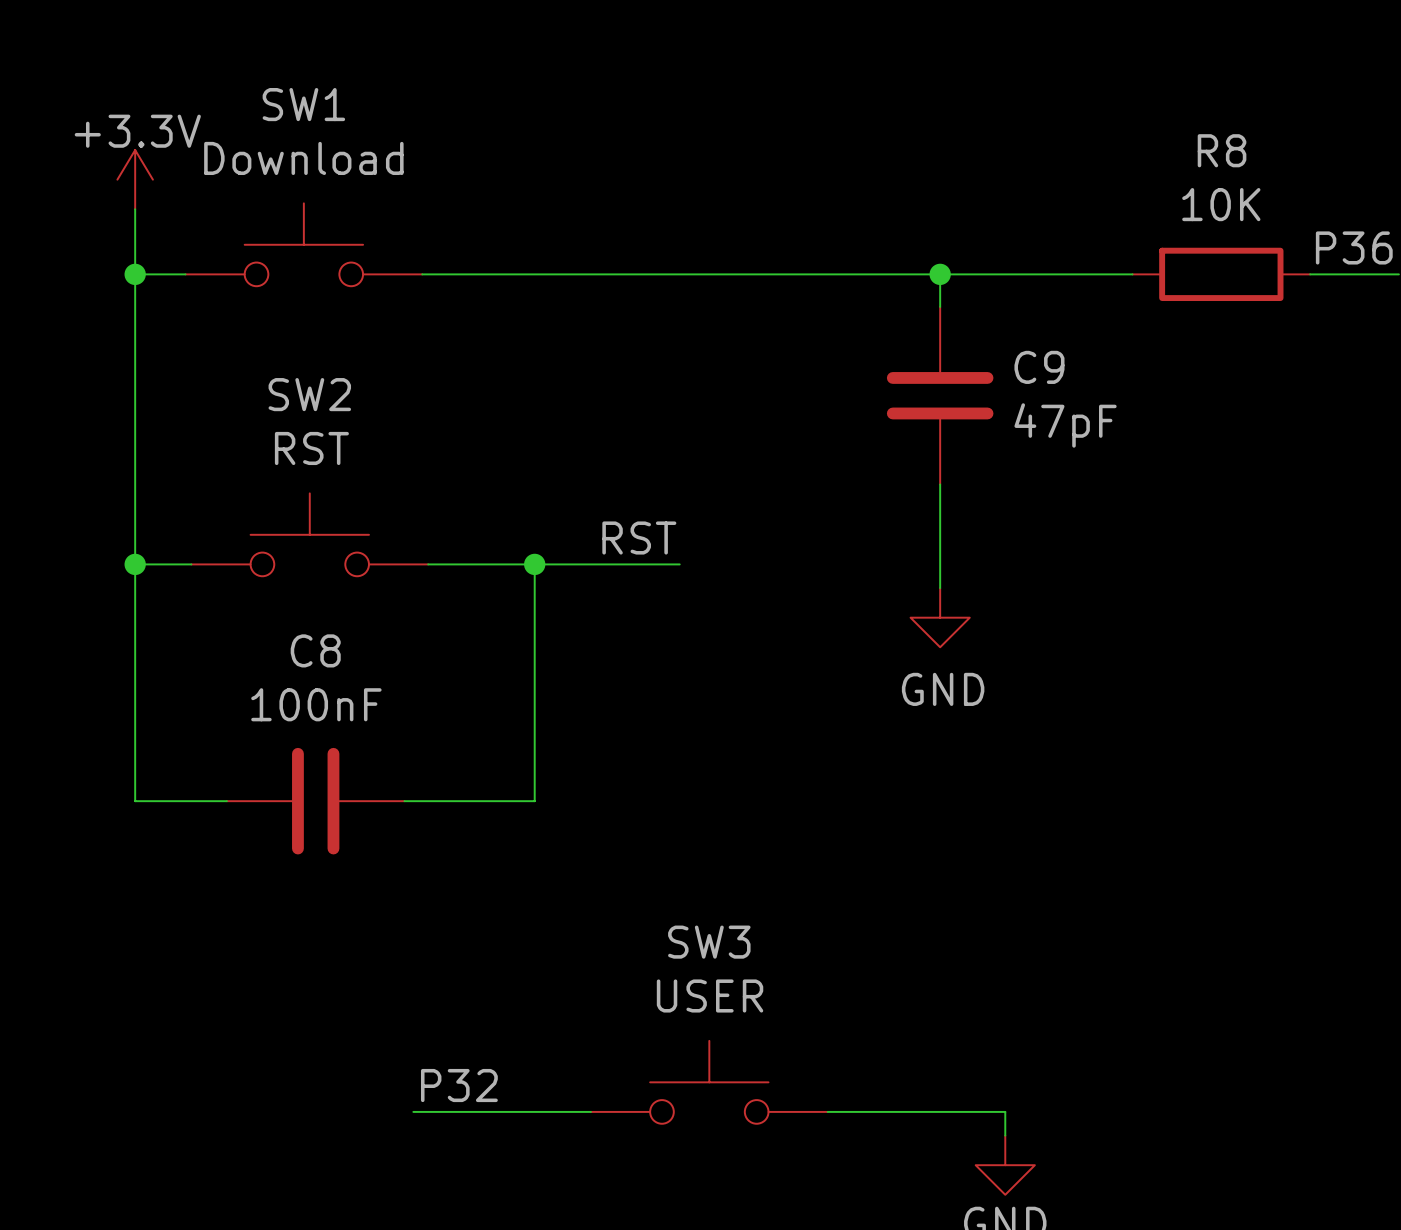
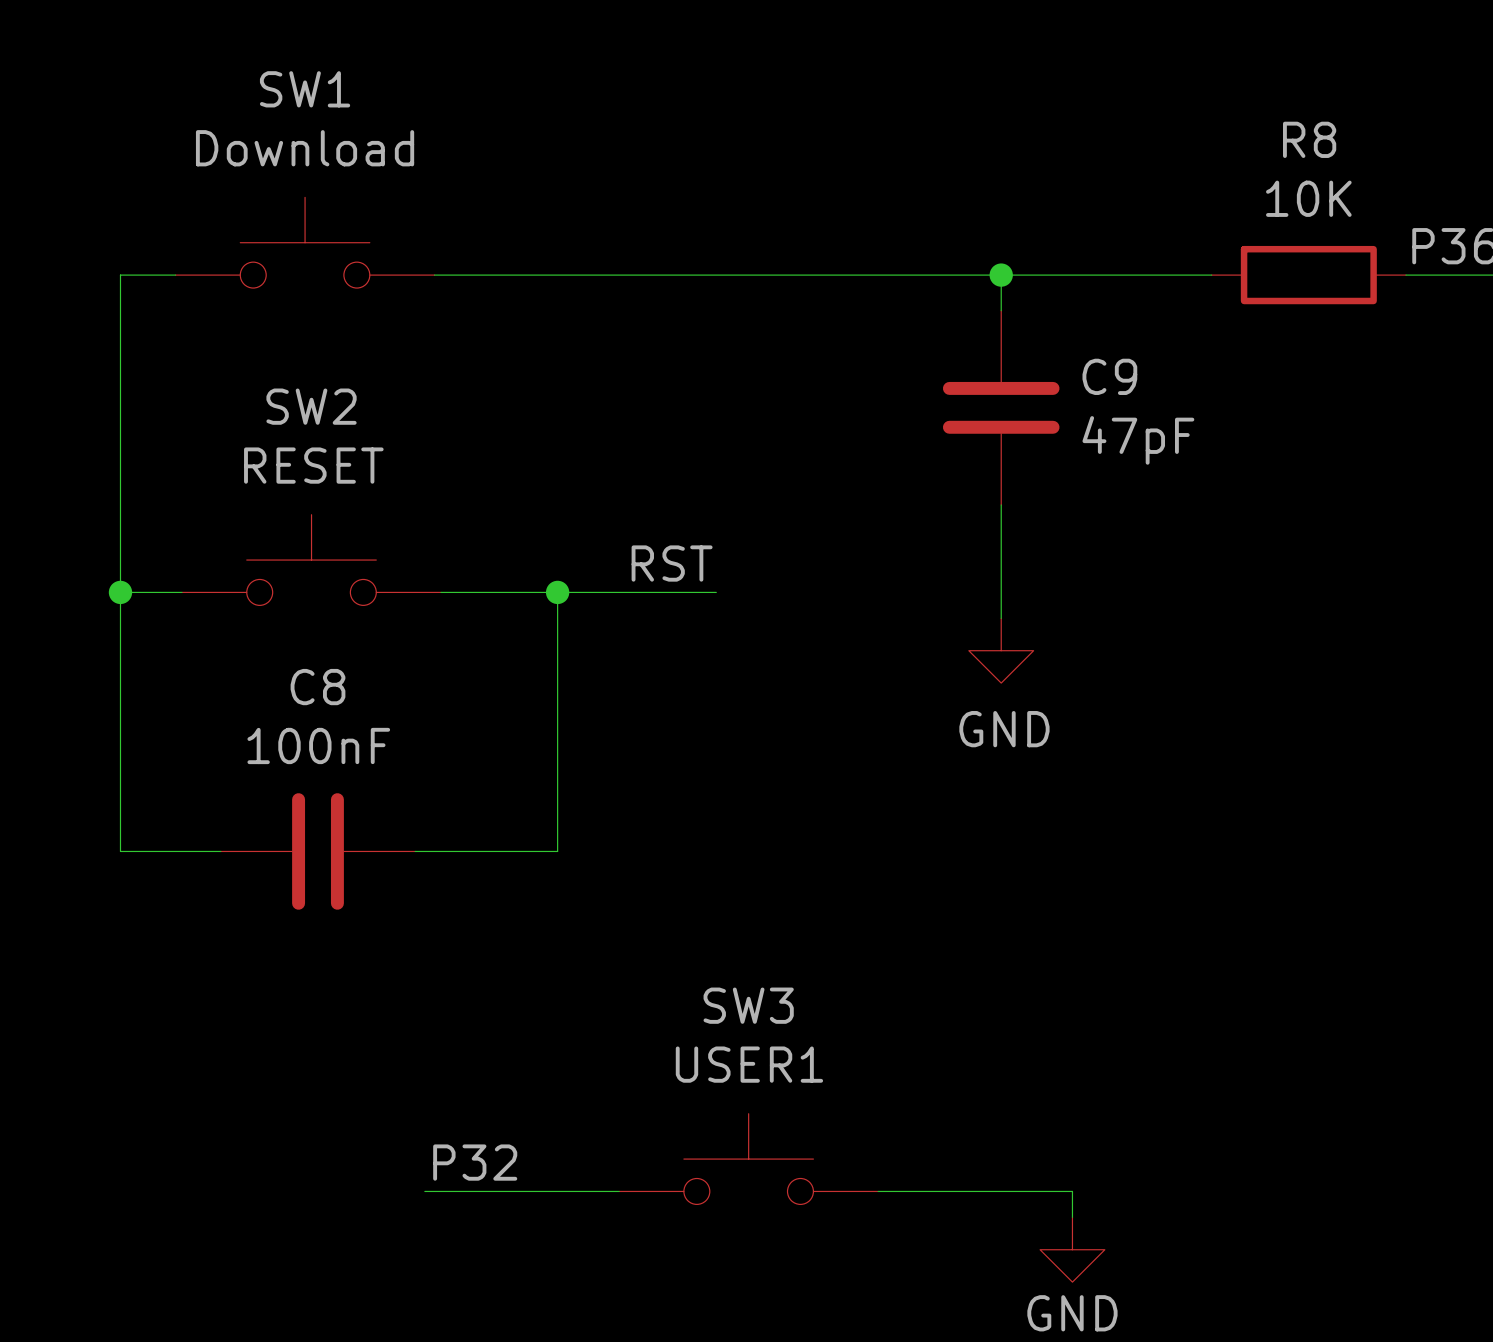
power symbol: +3.3V (135, 179) -> none
wire: (135, 209) (135, 274) -> none
junction: (135, 274) -> none
SW2 value: RST (311, 448) -> RESET (313, 465)
SW3 value: USER (710, 995) -> USER1 (749, 1064)

